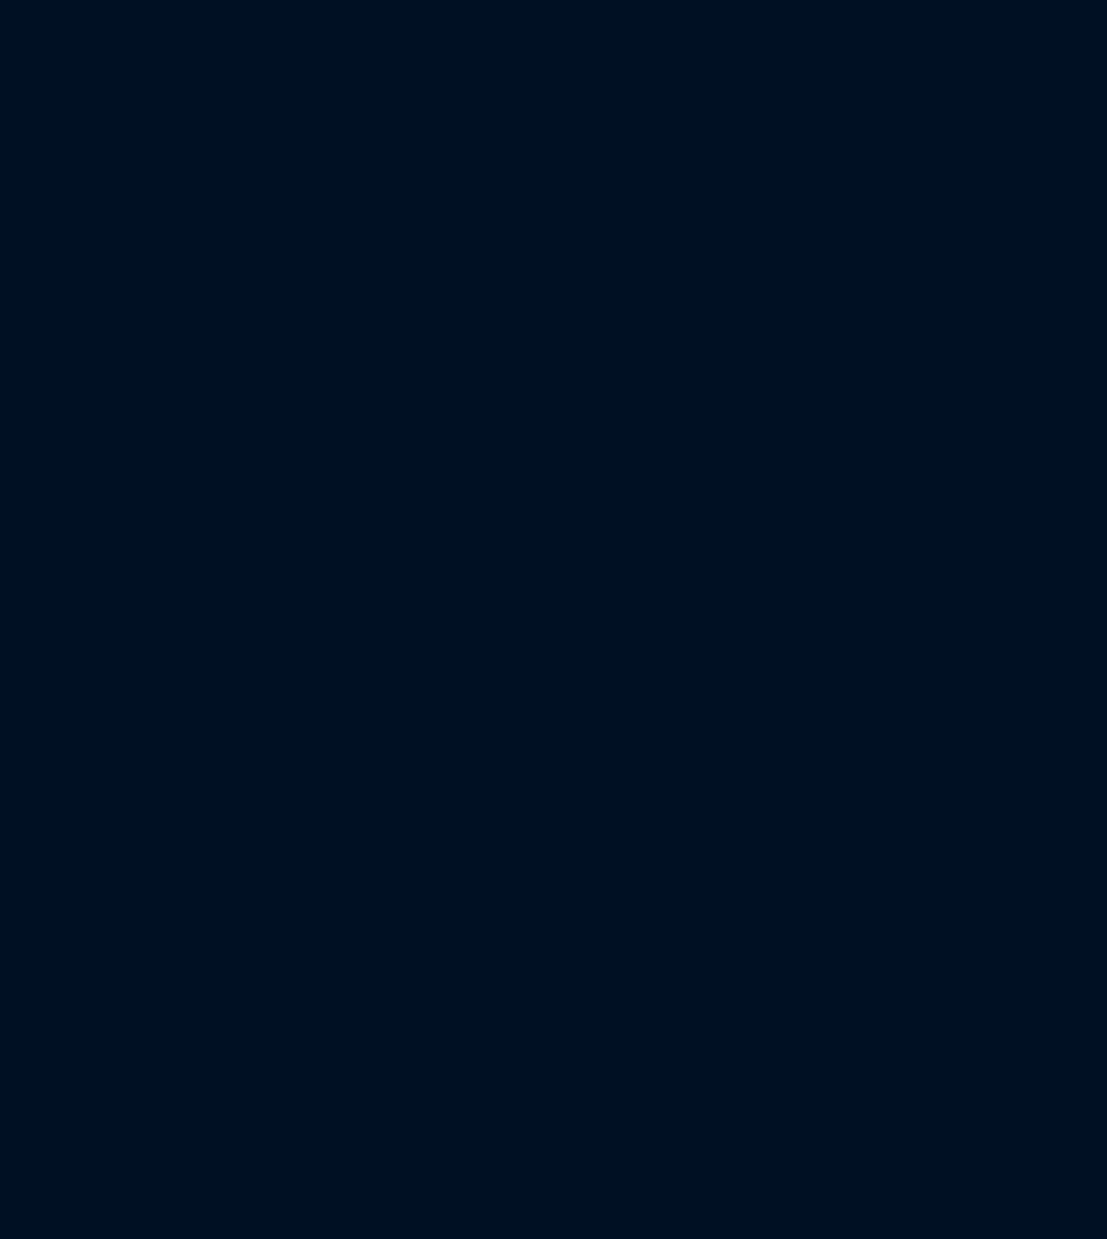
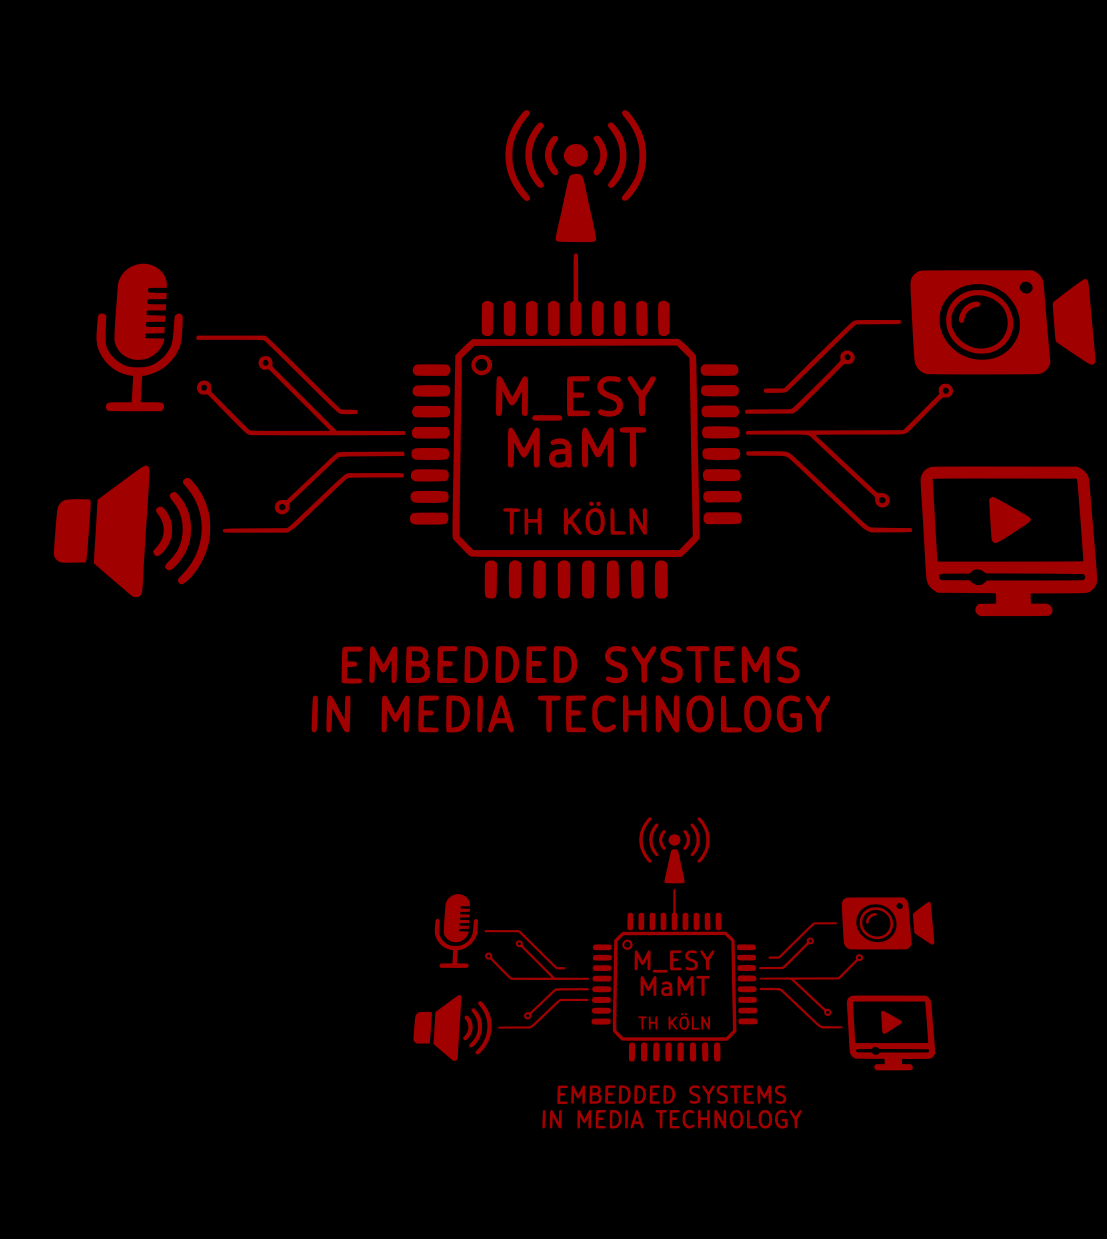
drawing: none -> [53, 110, 1098, 733]
drawing: none -> [413, 817, 936, 1129]

